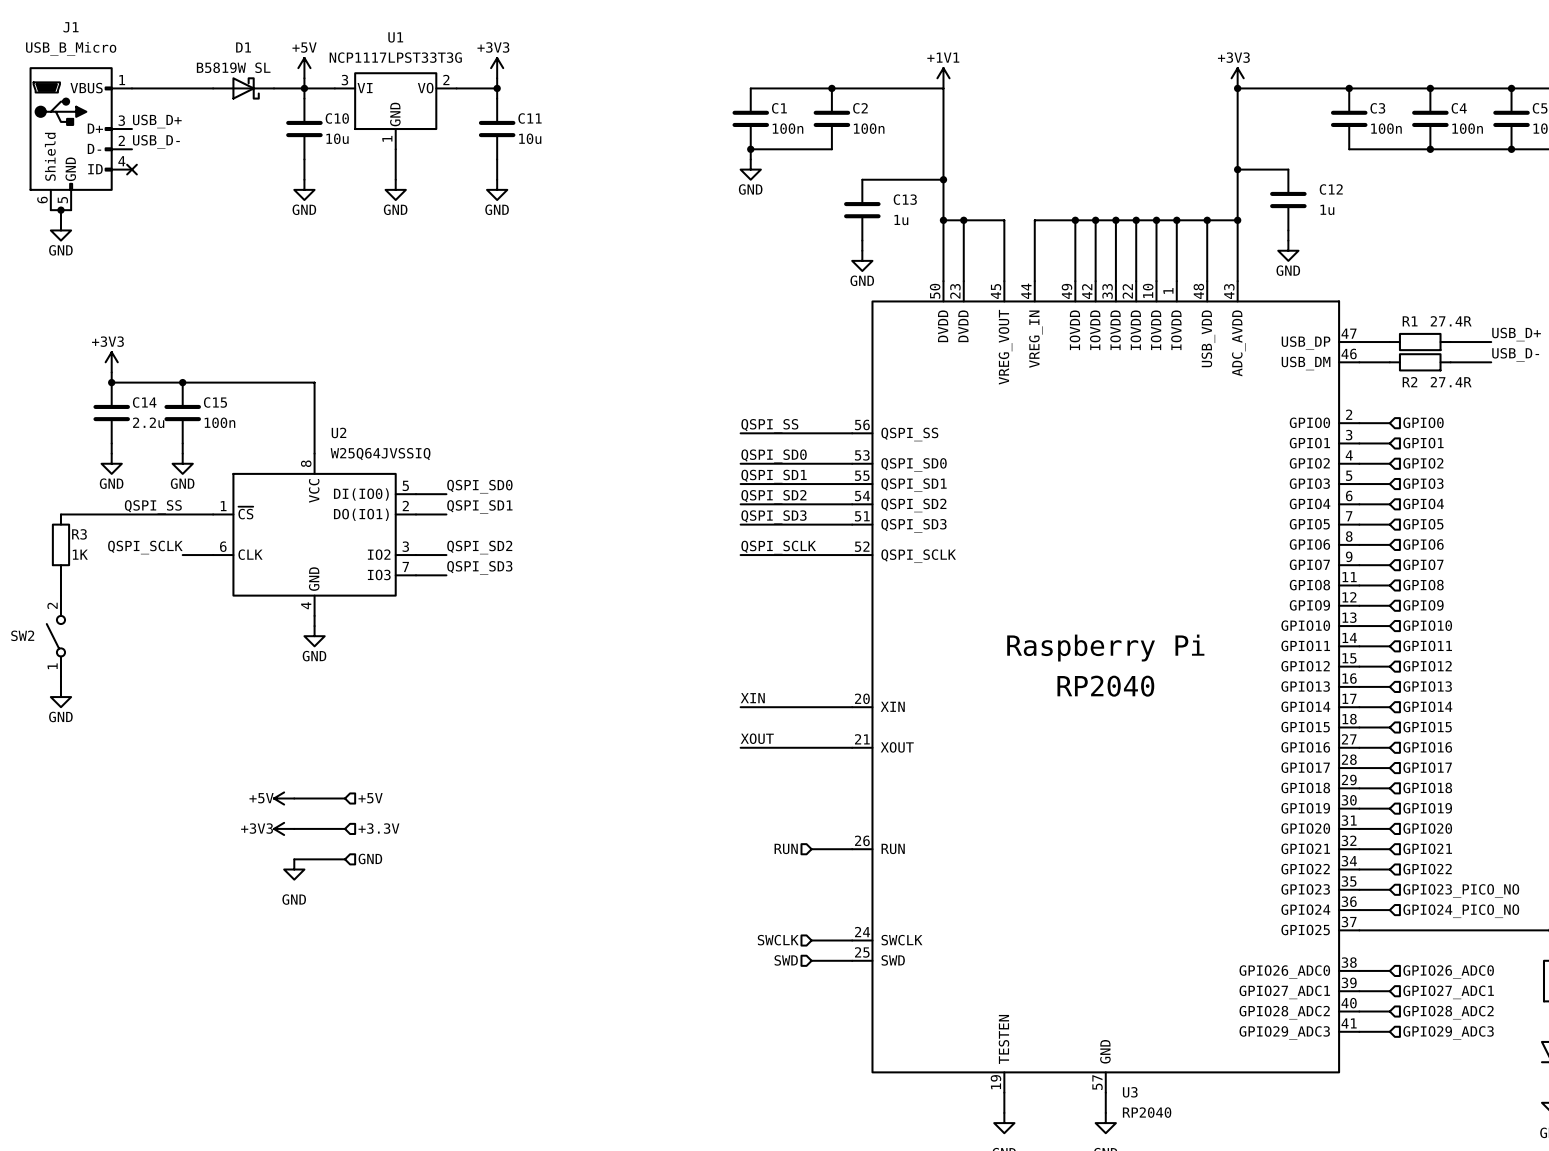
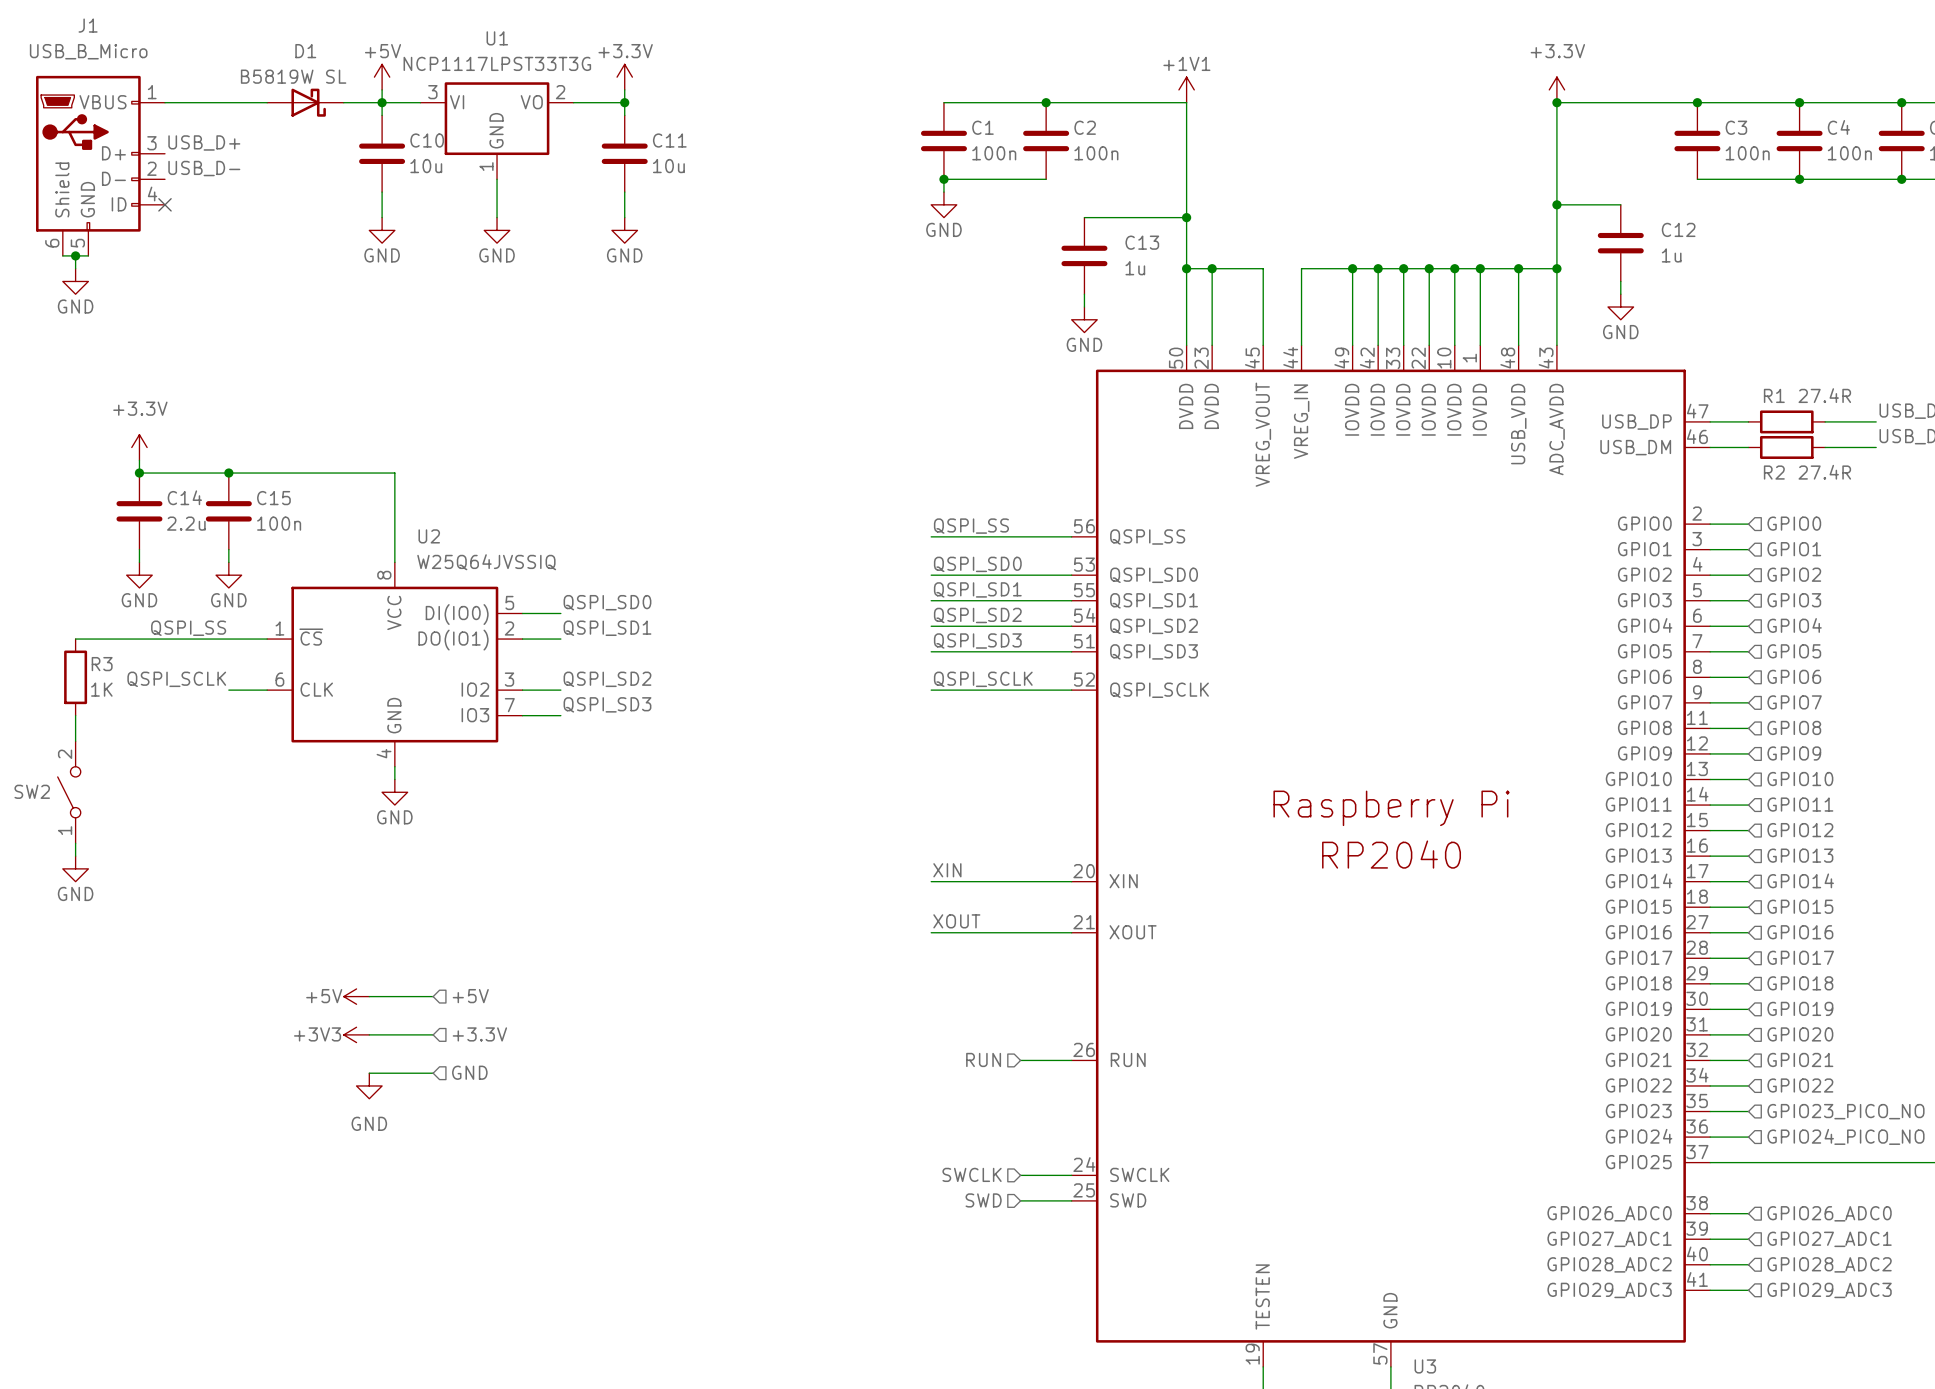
power symbol: +3V3 (497, 68) -> +3.3V (624, 77)
power symbol: +3V3 (1237, 78) -> +3.3V (1556, 89)
power symbol: +3V3 (111, 362) -> +3.3V (139, 447)

